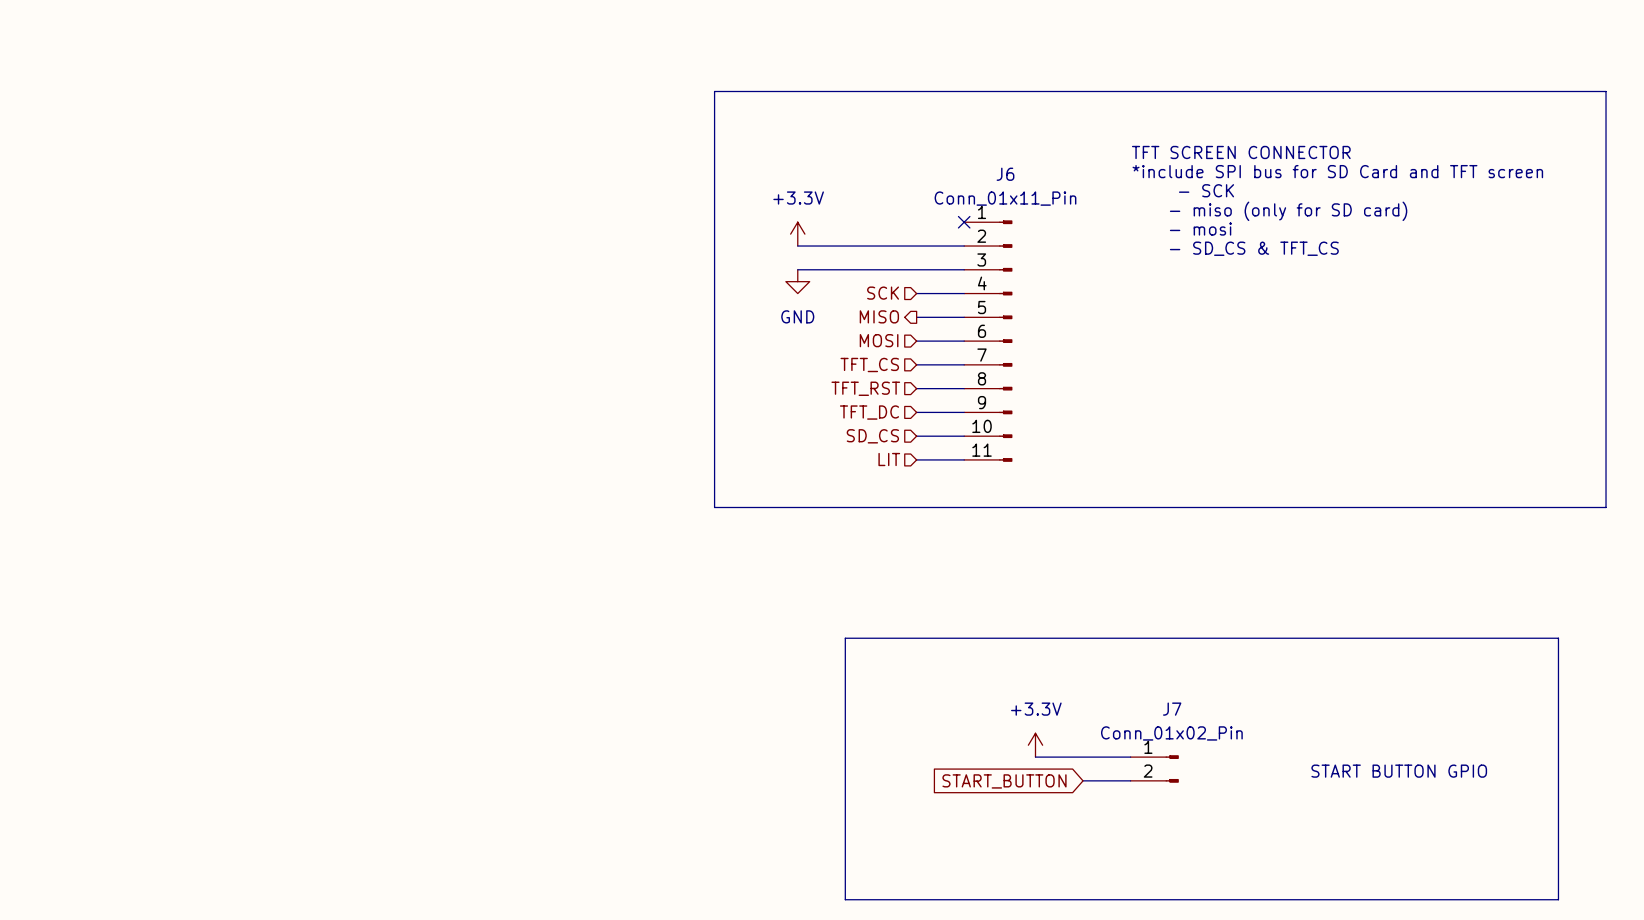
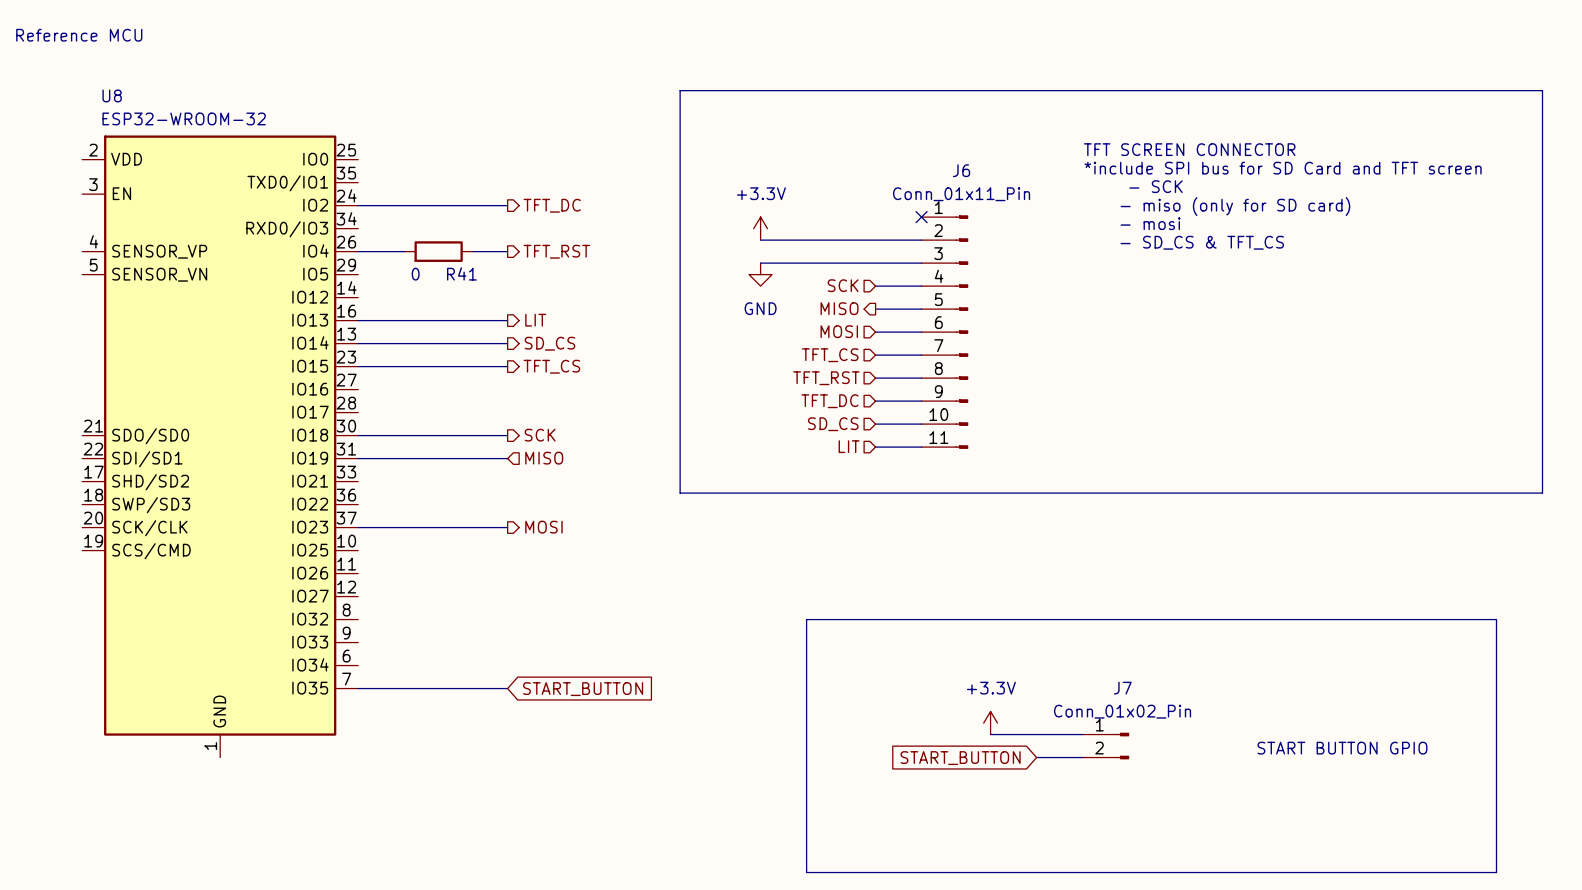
text: none -> Reference MCU (79, 35)
wire: none -> (358, 205) (507, 205)
hierarchical label: none -> TFT_DC (552, 205)
wire: none -> (358, 251) (404, 251)
R41: none -> 0 (438, 251)
wire: none -> (473, 251) (507, 251)
hierarchical label: none -> TFT_RST (556, 251)
hierarchical label: none -> LIT (535, 320)
wire: none -> (358, 320) (507, 320)
wire: none -> (358, 343) (507, 343)
hierarchical label: none -> SD_CS (549, 343)
wire: none -> (358, 366) (507, 366)
hierarchical label: none -> TFT_CS (551, 366)
hierarchical label: none -> SCK (540, 435)
wire: none -> (358, 435) (507, 435)
U8: none -> ESP32-WROOM-32 (220, 446)
wire: none -> (358, 458) (507, 458)
hierarchical label: none -> MISO (544, 458)
hierarchical label: none -> MOSI (543, 527)
wire: none -> (358, 527) (507, 527)
wire: none -> (358, 688) (507, 688)
global label: none -> START_BUTTON (583, 689)

